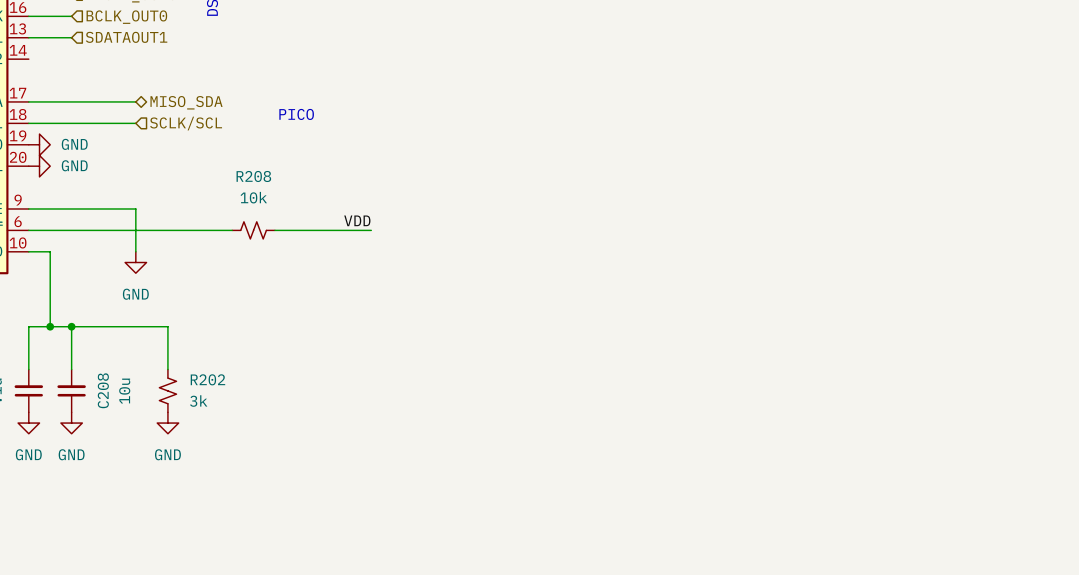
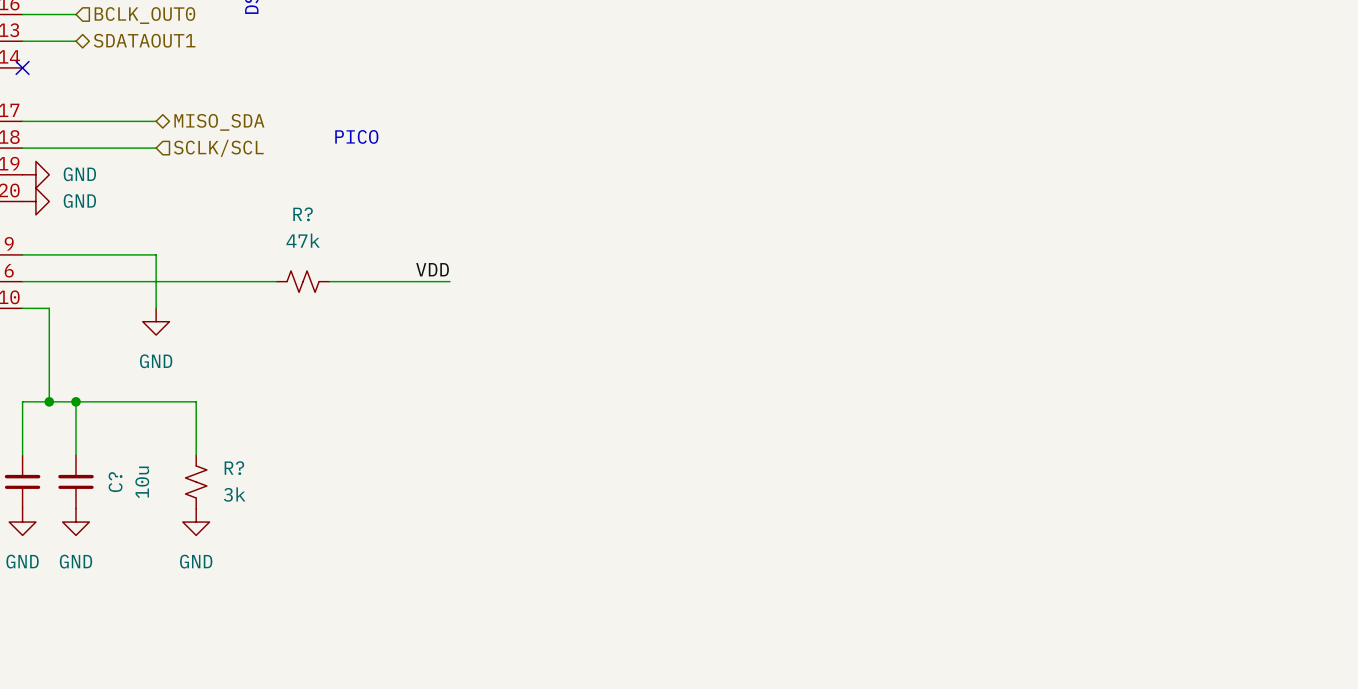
hierarchical label shape: input (126, 37) -> bidirectional (144, 40)
no-connect mark: none -> (22, 67)
R208 name: R208 (253, 176) -> R? (303, 214)
R208 value: 10k (253, 197) -> 47k (303, 240)
R202 name: R202 (207, 379) -> R? (234, 468)
C208 name: C208 (103, 390) -> C? (115, 482)

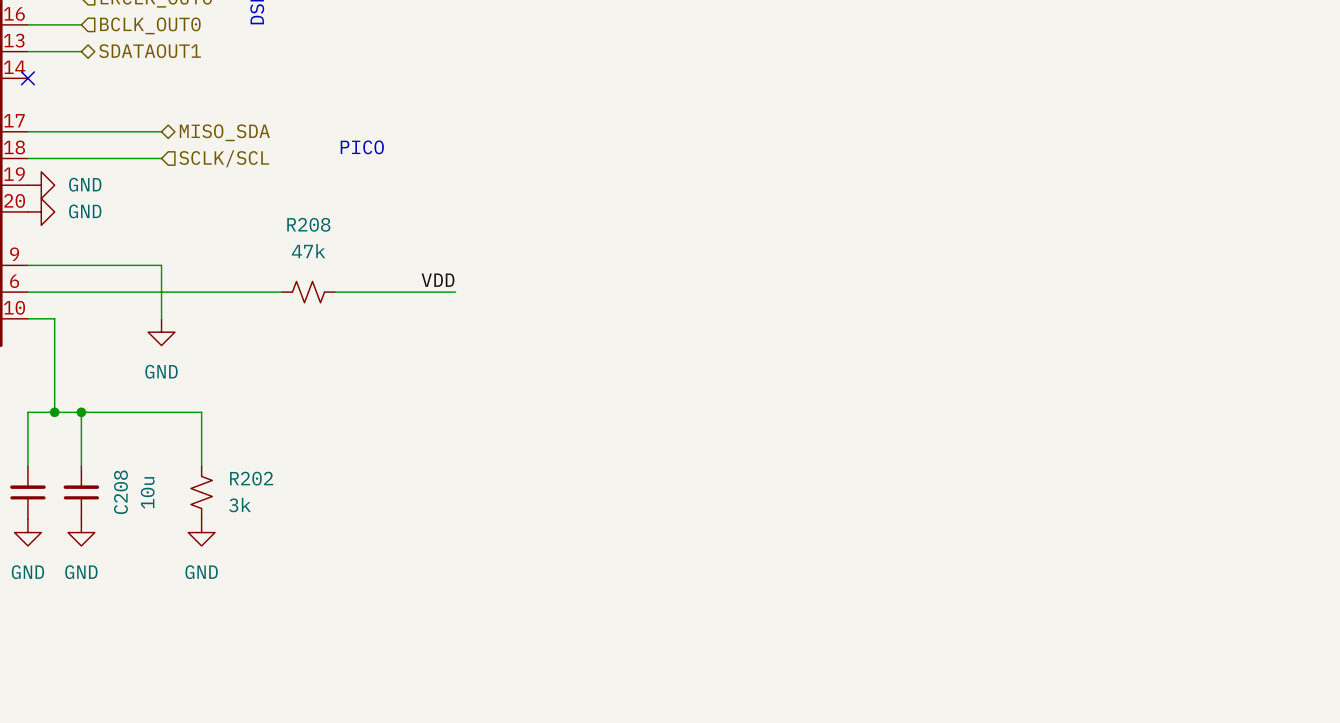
R? name: R? (303, 214) -> R208 (308, 224)
R? name: R? (234, 468) -> R202 (251, 478)
C? name: C? (115, 482) -> C208 (120, 492)

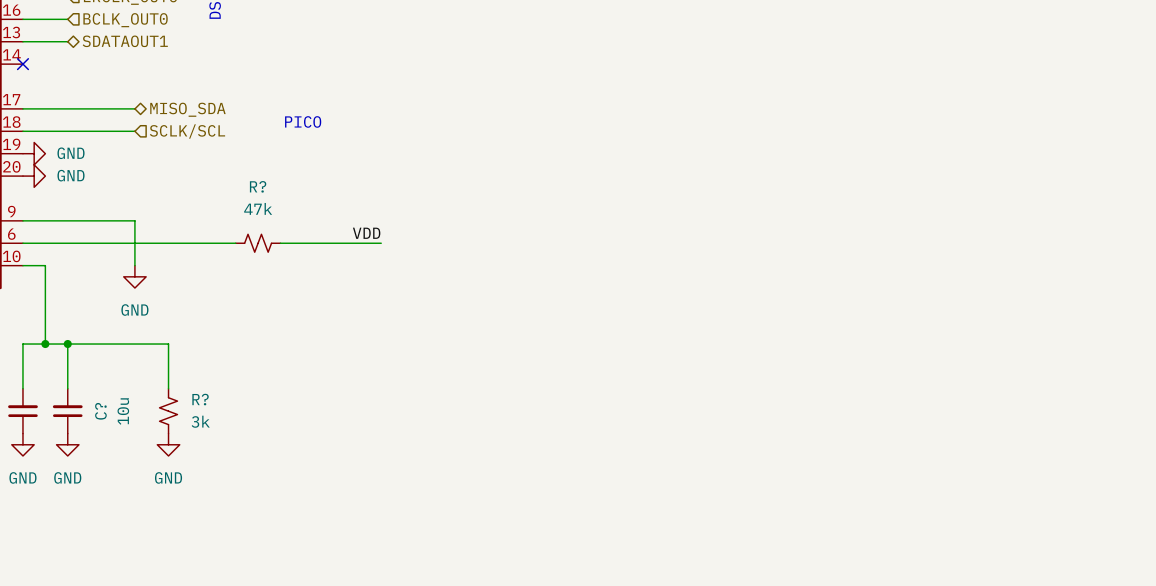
R208 name: R208 (308, 224) -> R? (258, 186)
R202 name: R202 (251, 478) -> R? (200, 399)
C208 name: C208 (120, 492) -> C? (100, 411)

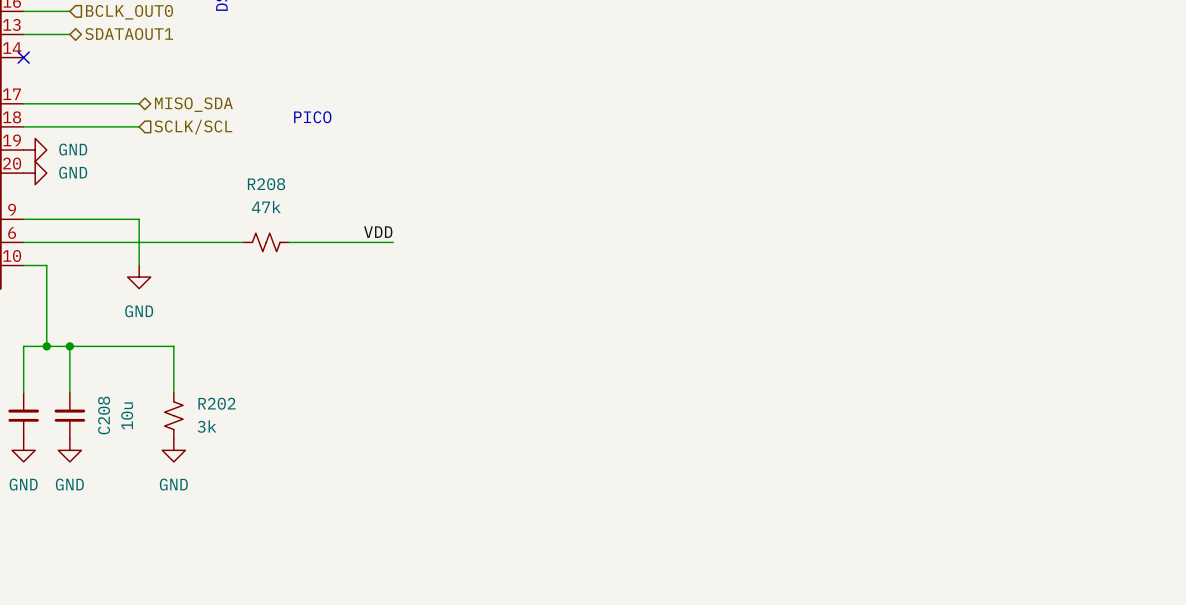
R? name: R? (258, 186) -> R208 (266, 184)
R? name: R? (200, 399) -> R202 (217, 403)
C? name: C? (100, 411) -> C208 (104, 415)

